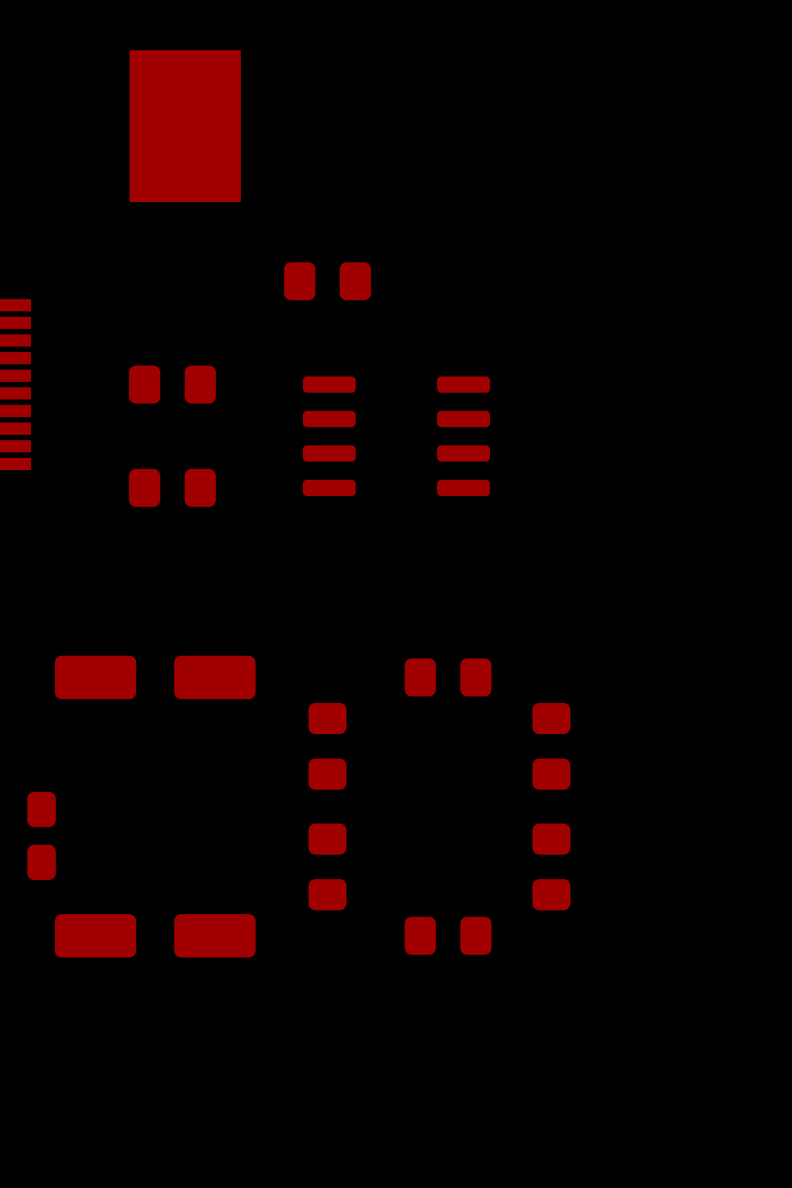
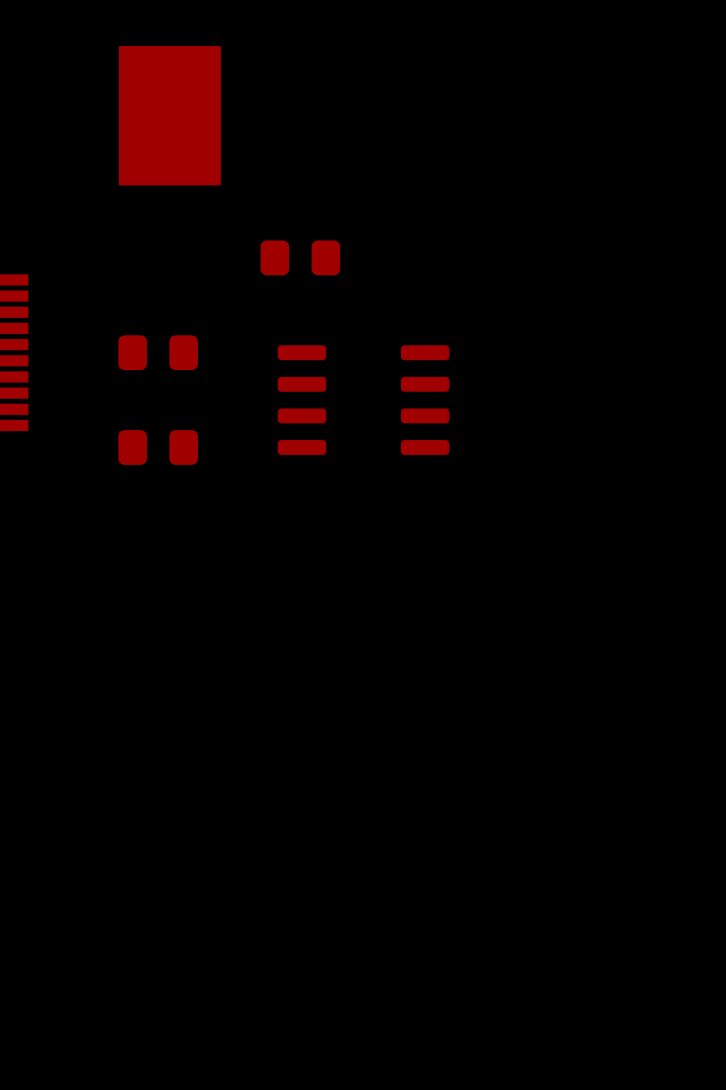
part: (155, 677) -> none
part: (448, 677) -> none
part: (327, 746) -> none
part: (551, 746) -> none
part: (41, 835) -> none
part: (327, 866) -> none
part: (551, 866) -> none
part: (155, 935) -> none
part: (448, 935) -> none

